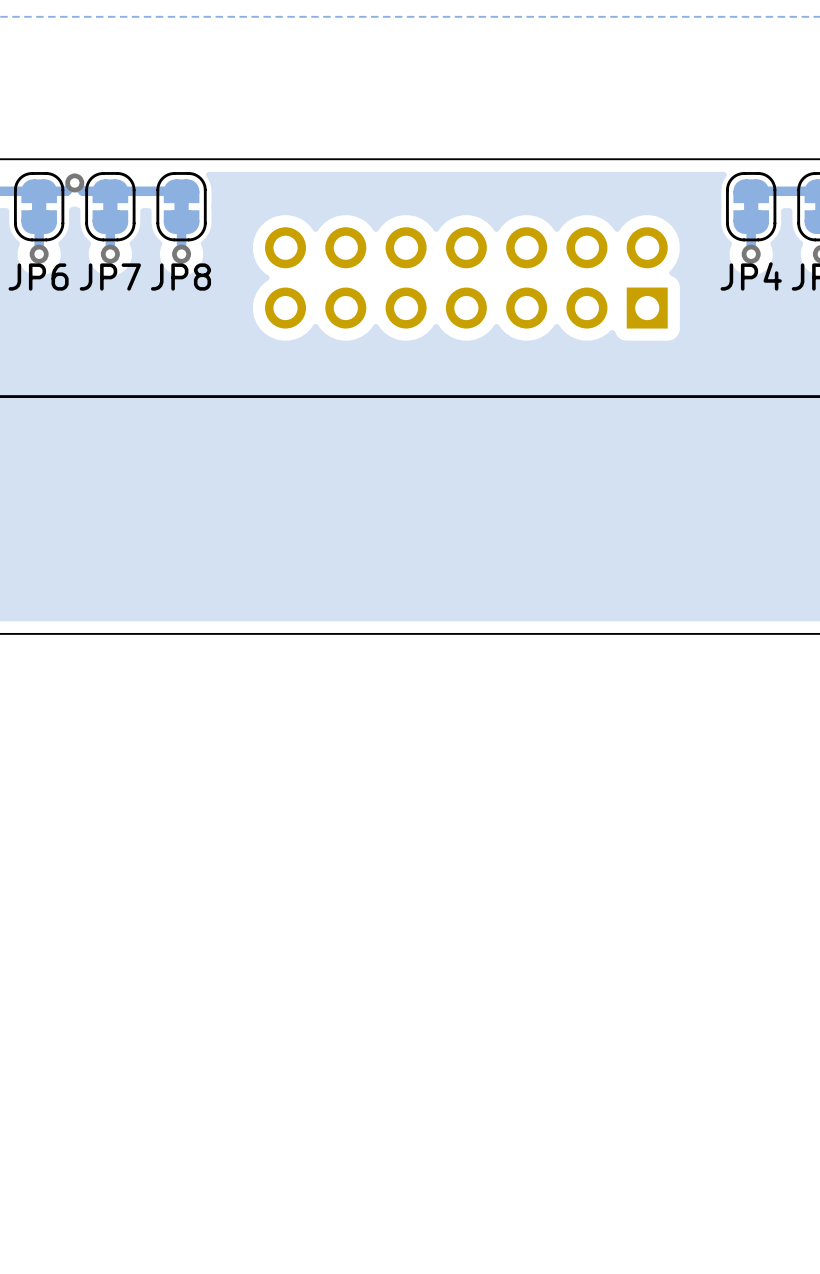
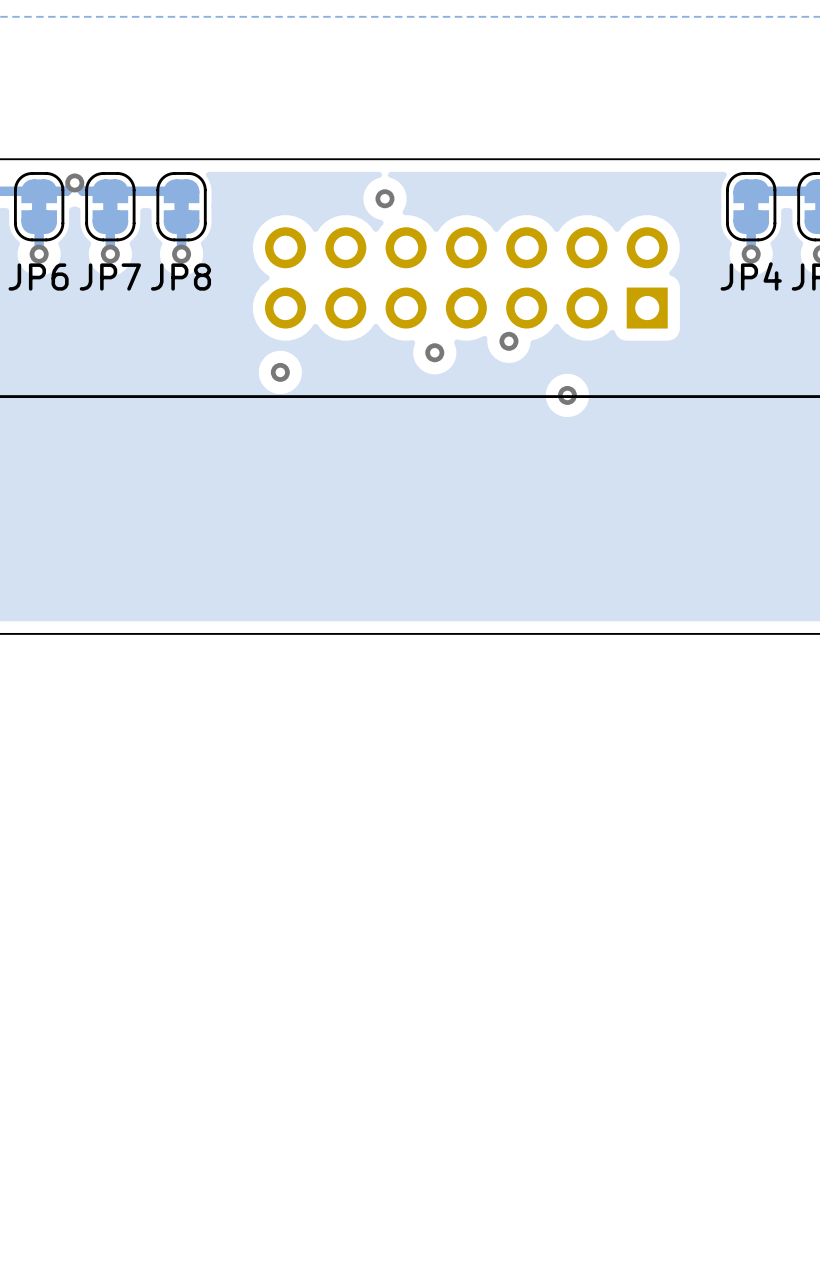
via: none -> (384, 198)
via: none -> (508, 341)
via: none -> (434, 352)
via: none -> (280, 372)
via: none -> (567, 395)

